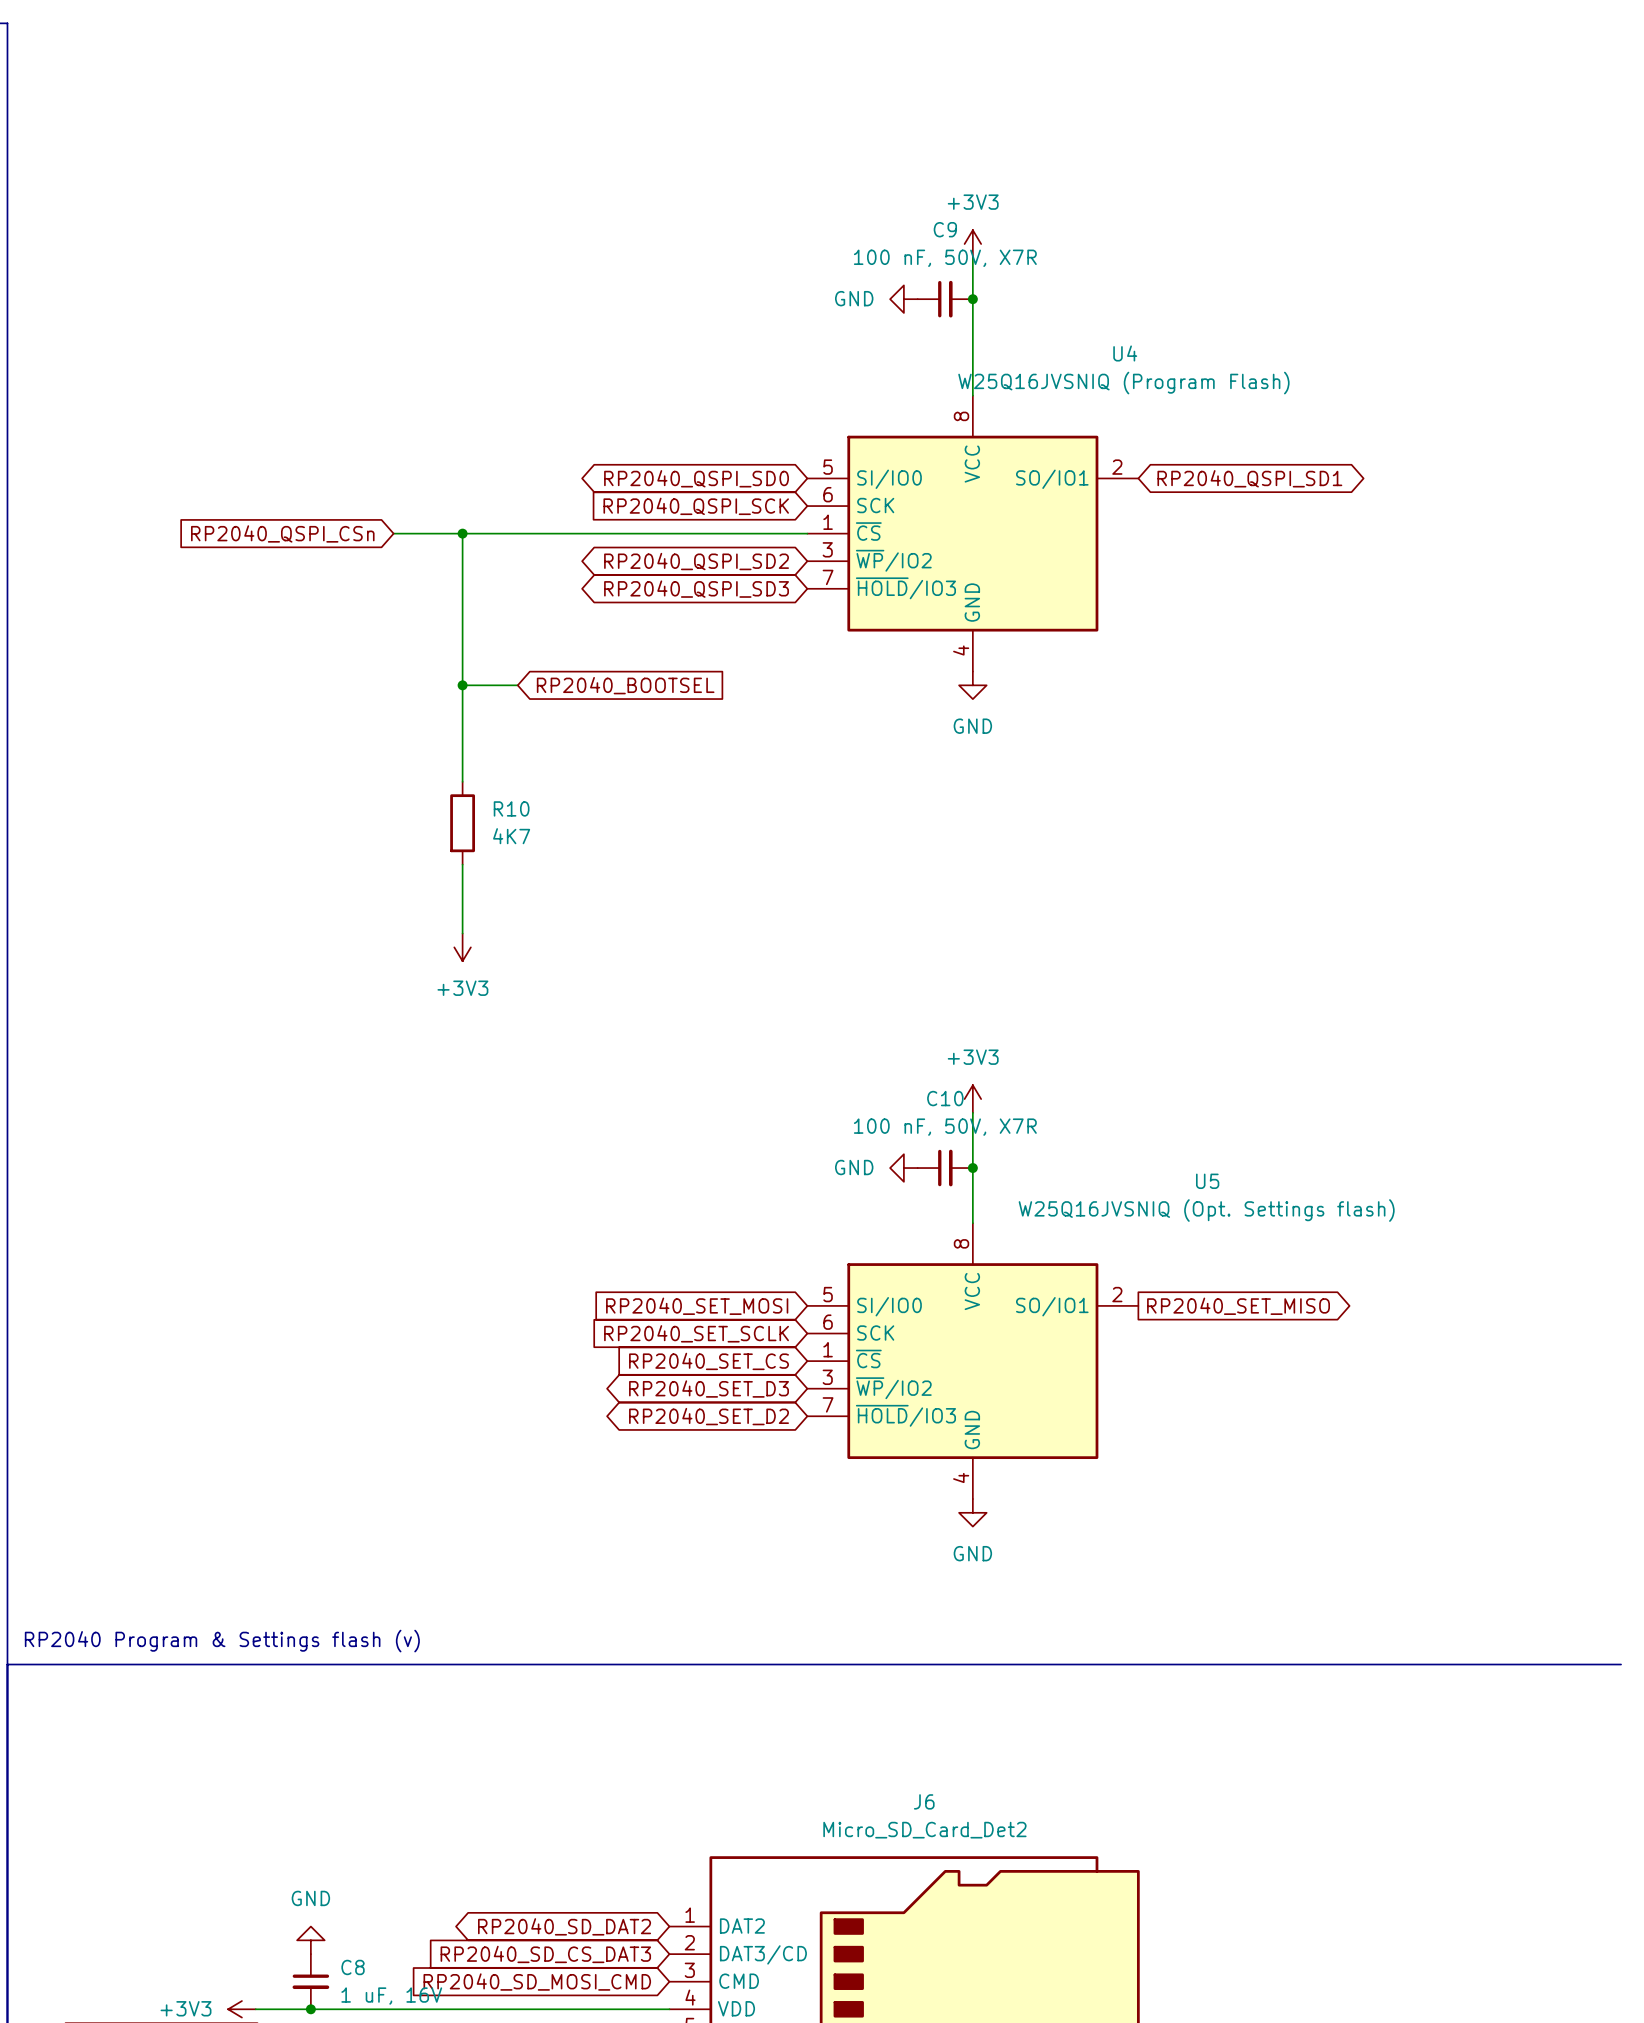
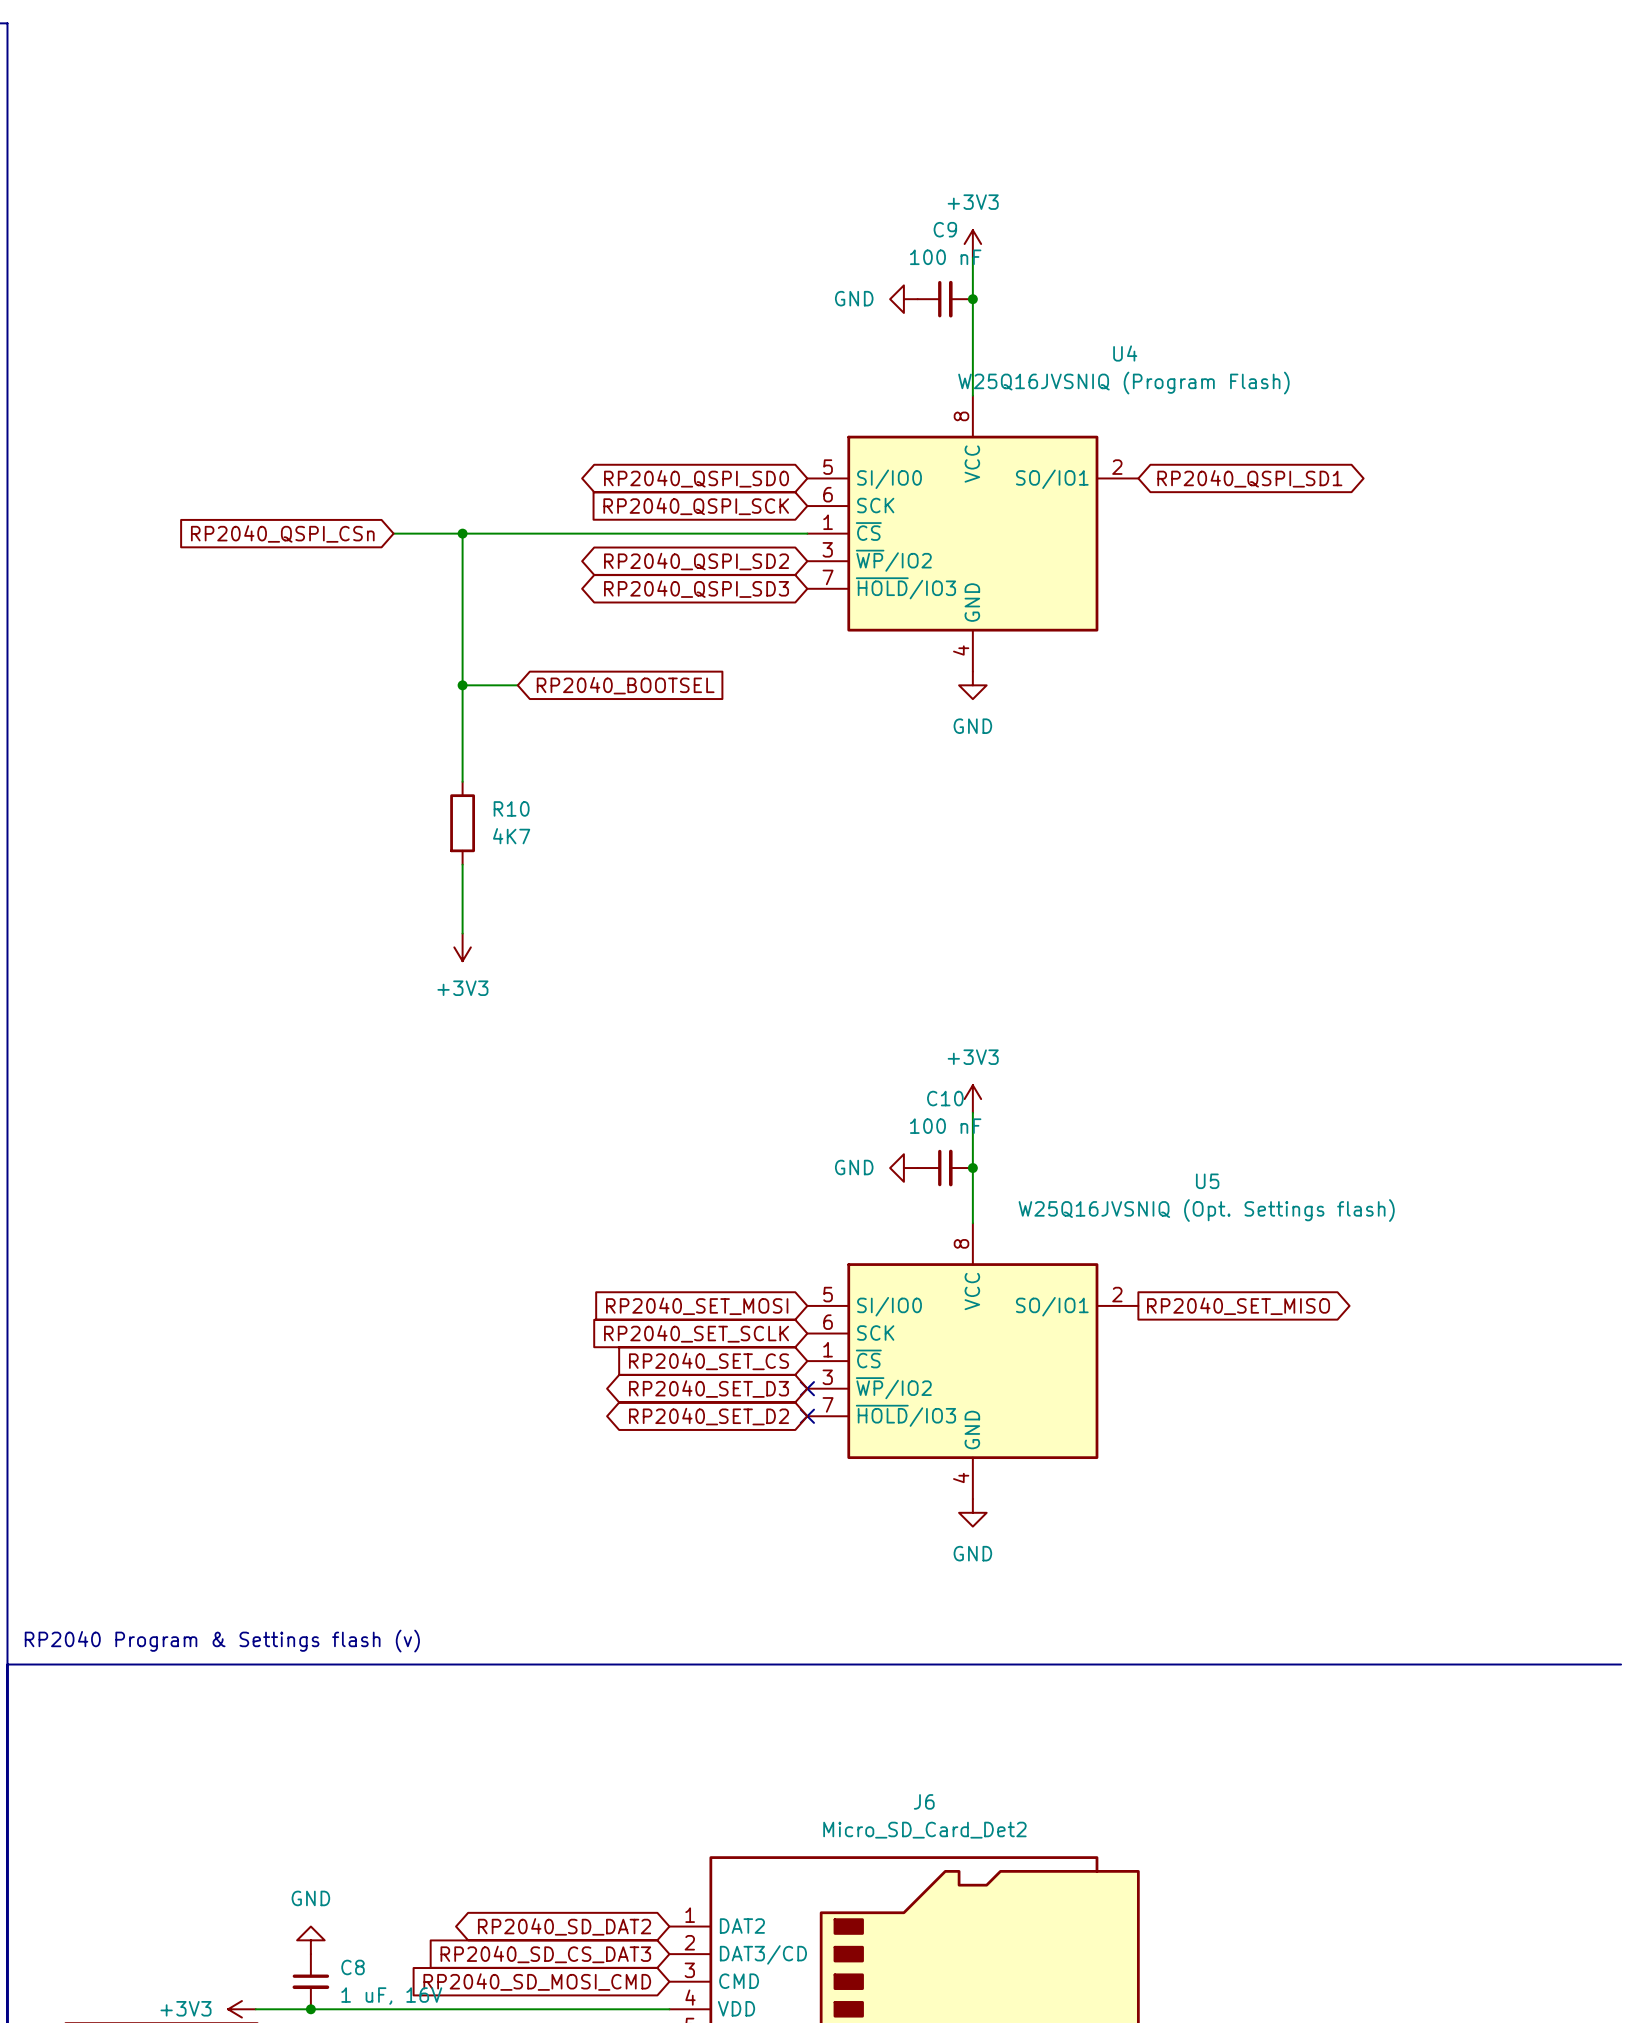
C9 value: 100 nF, 50V, X7R (945, 258) -> 100 nF (945, 257)
C10 value: 100 nF, 50V, X7R (945, 1127) -> 100 nF (945, 1126)
no-connect mark: none -> (807, 1388)
no-connect mark: none -> (807, 1416)

